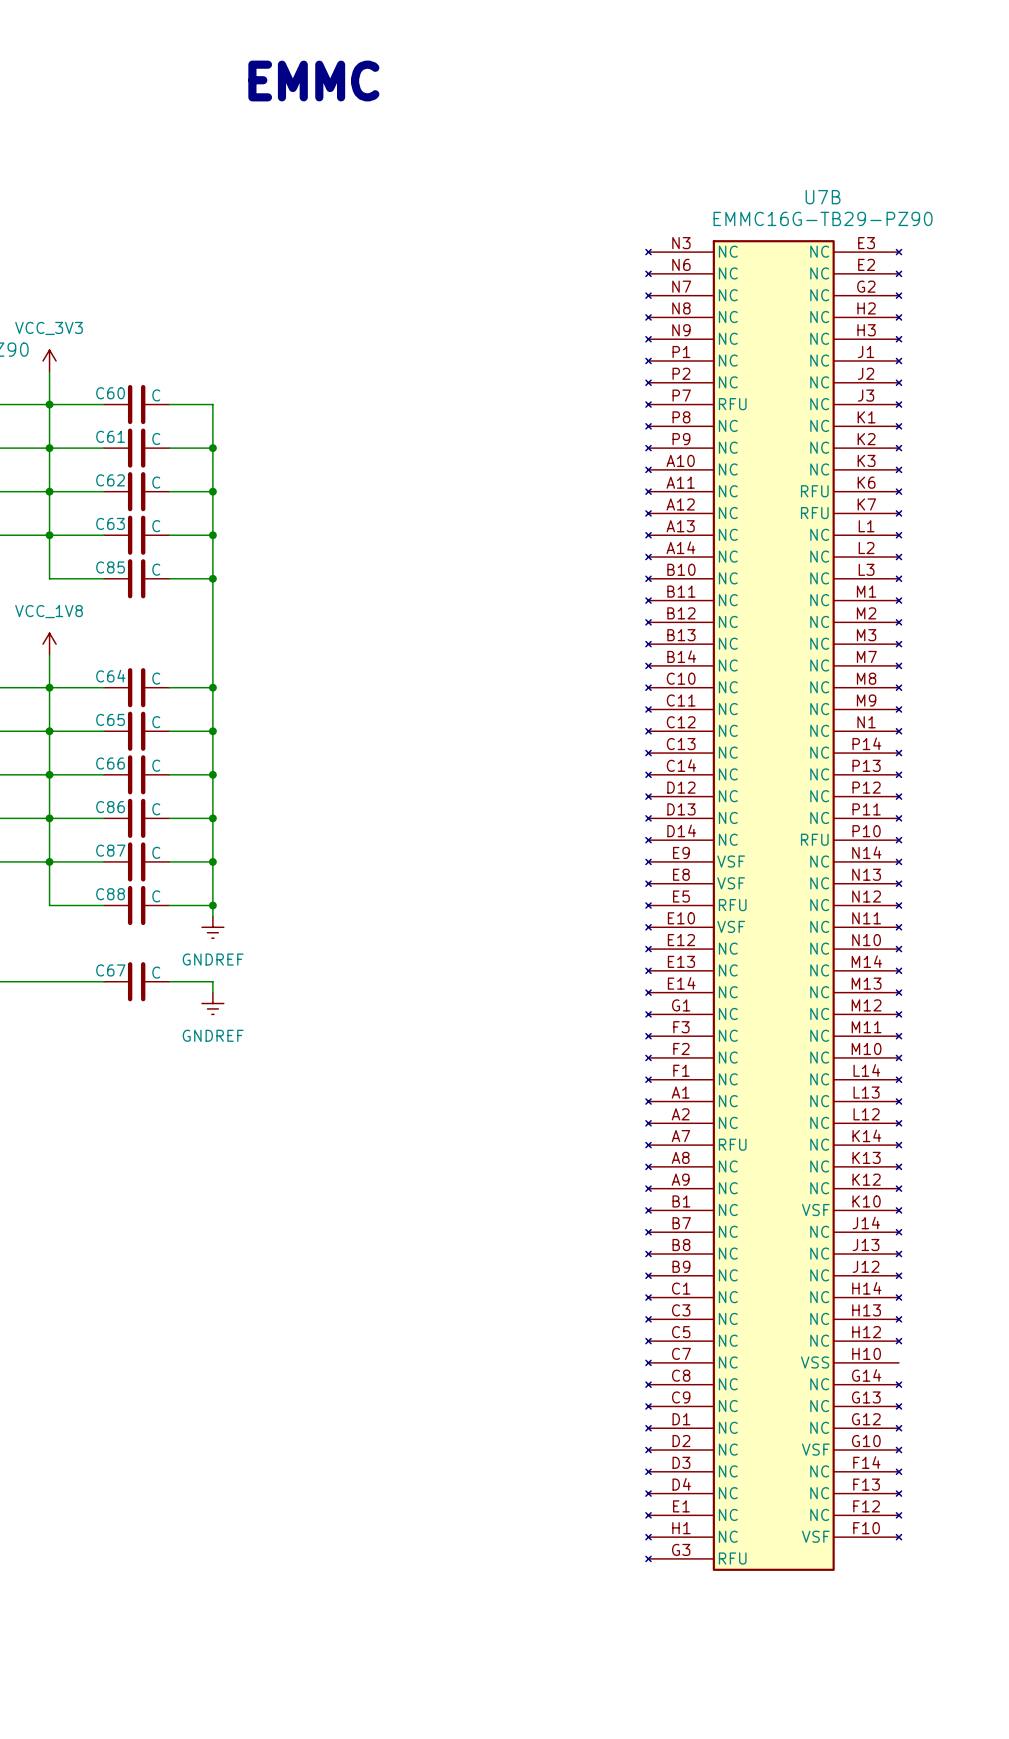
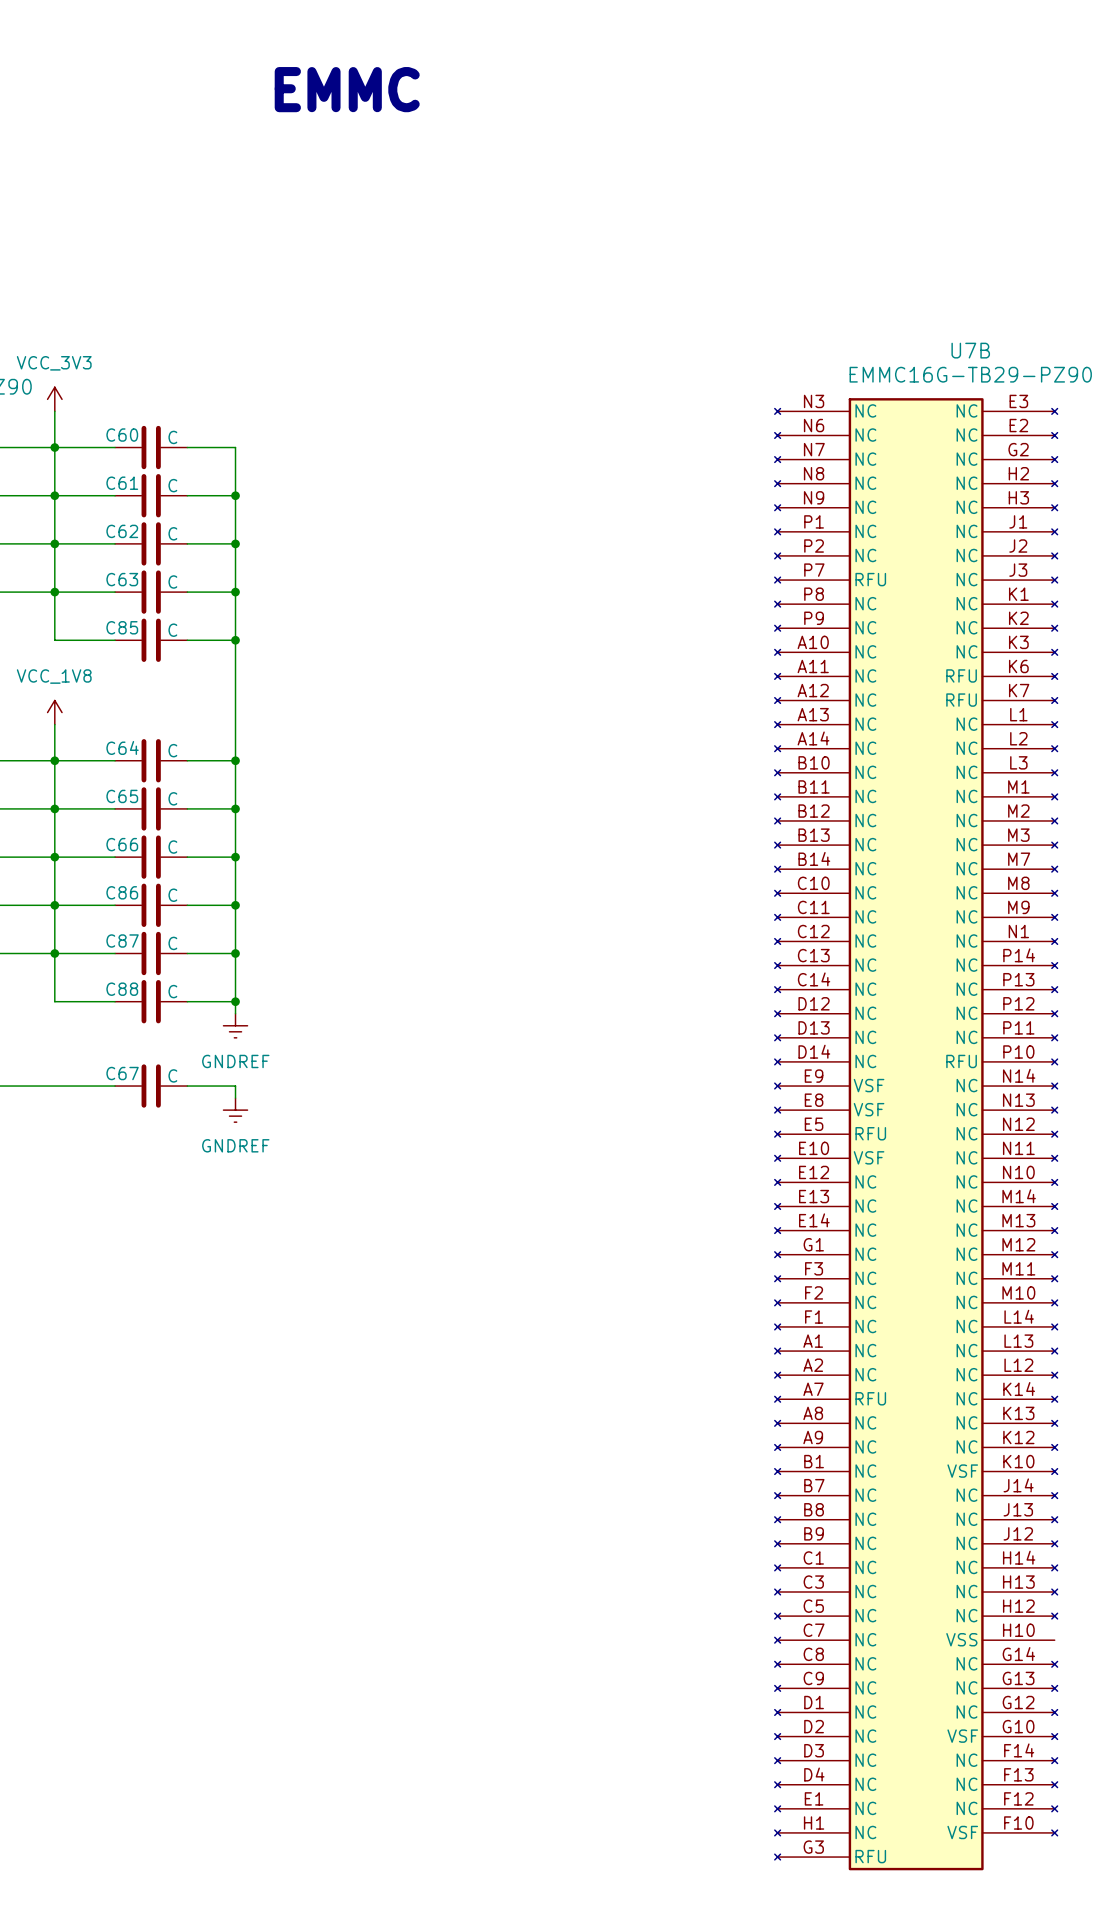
U7B position: (773, 905) -> (916, 1134)

